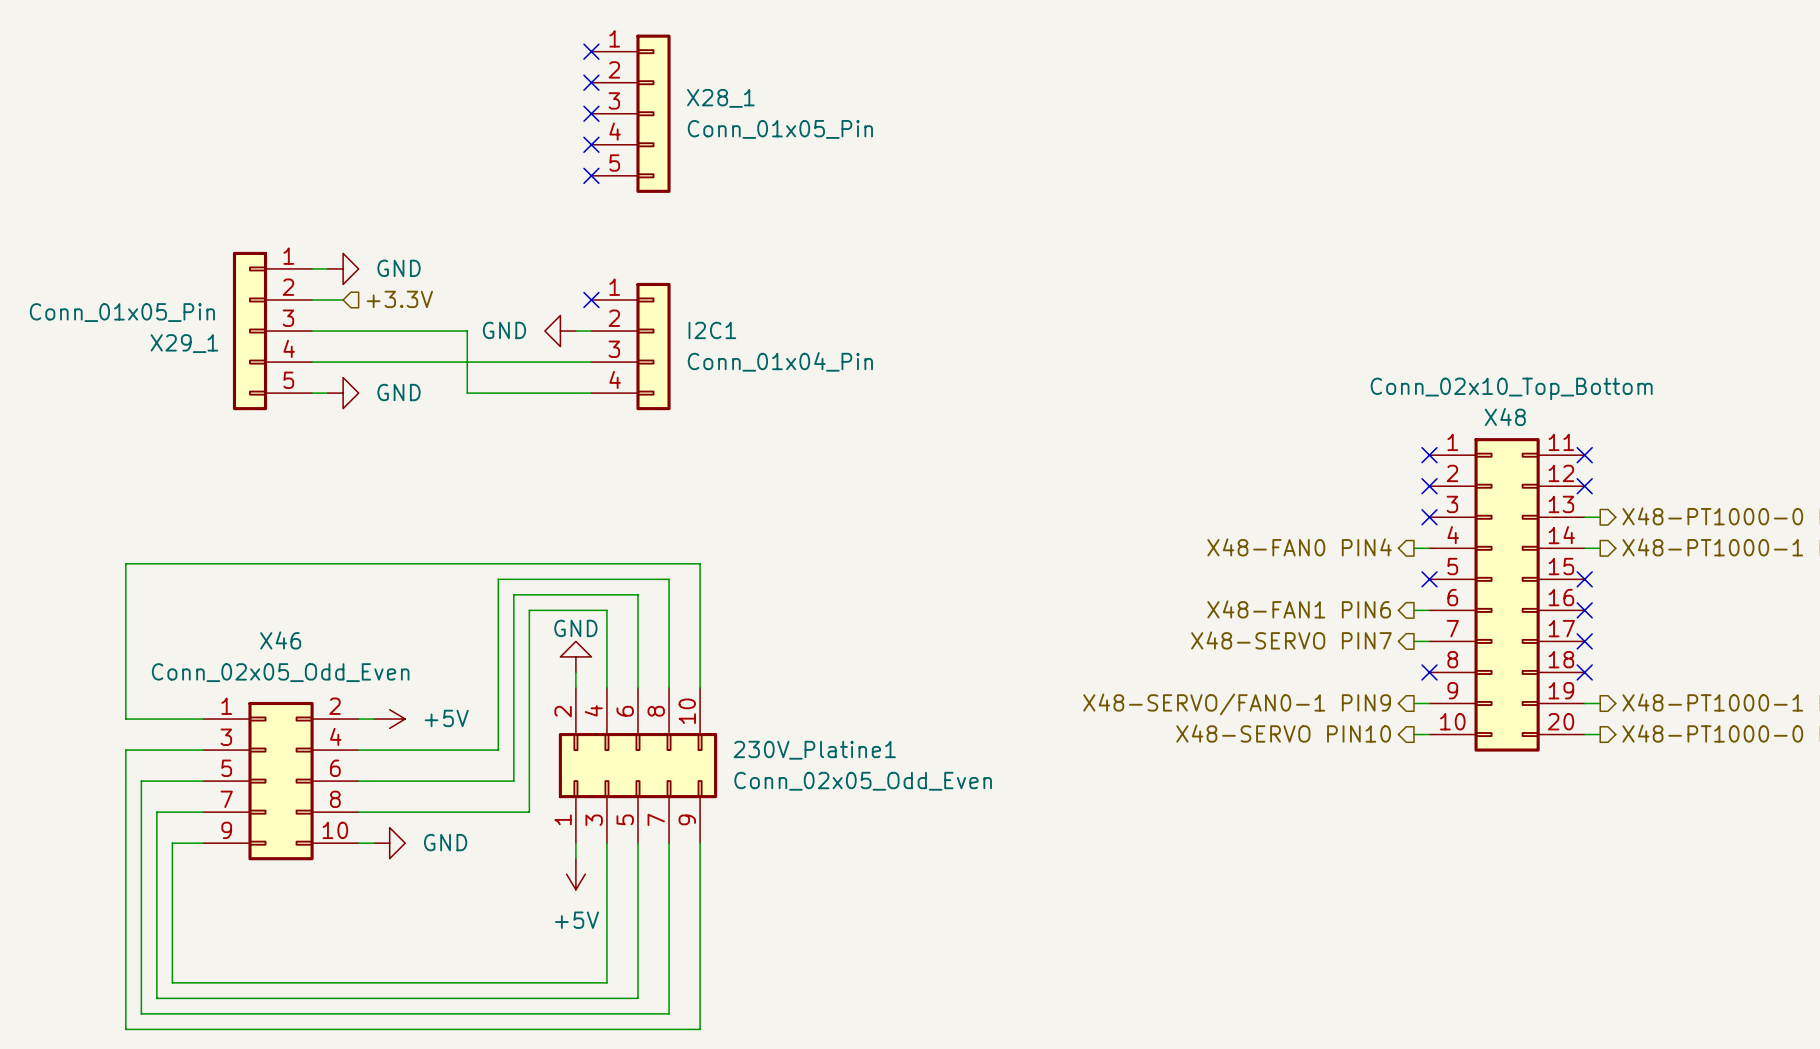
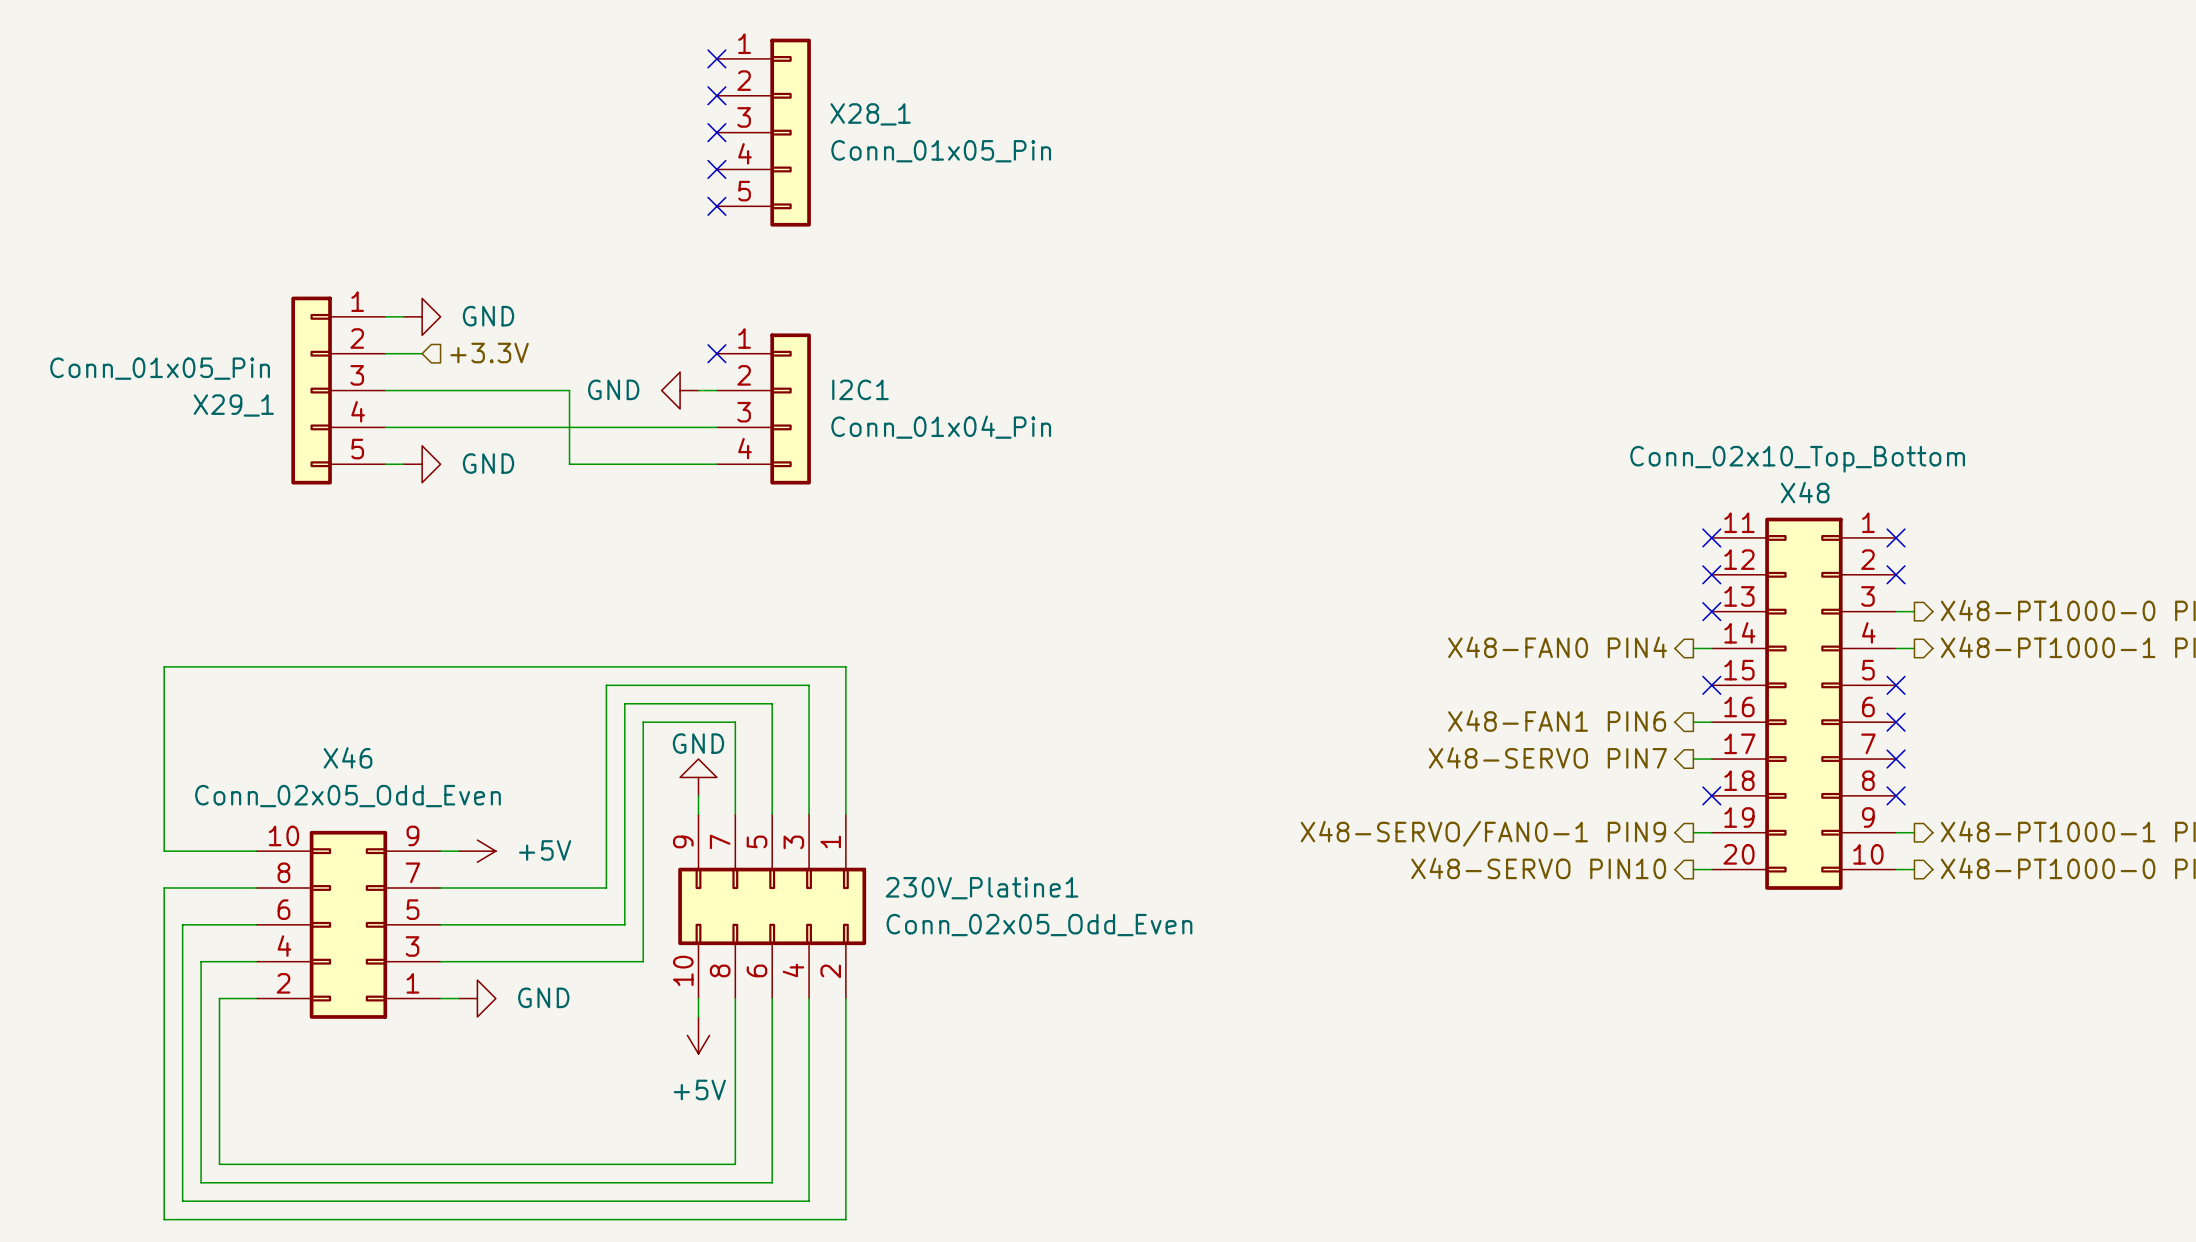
X48 flip: as is (1507, 594) -> left-right (1803, 703)
230V_Platine1 rotation: 0° (637, 765) -> 180° (772, 906)
X46 rotation: 0° (281, 781) -> 180° (348, 924)

